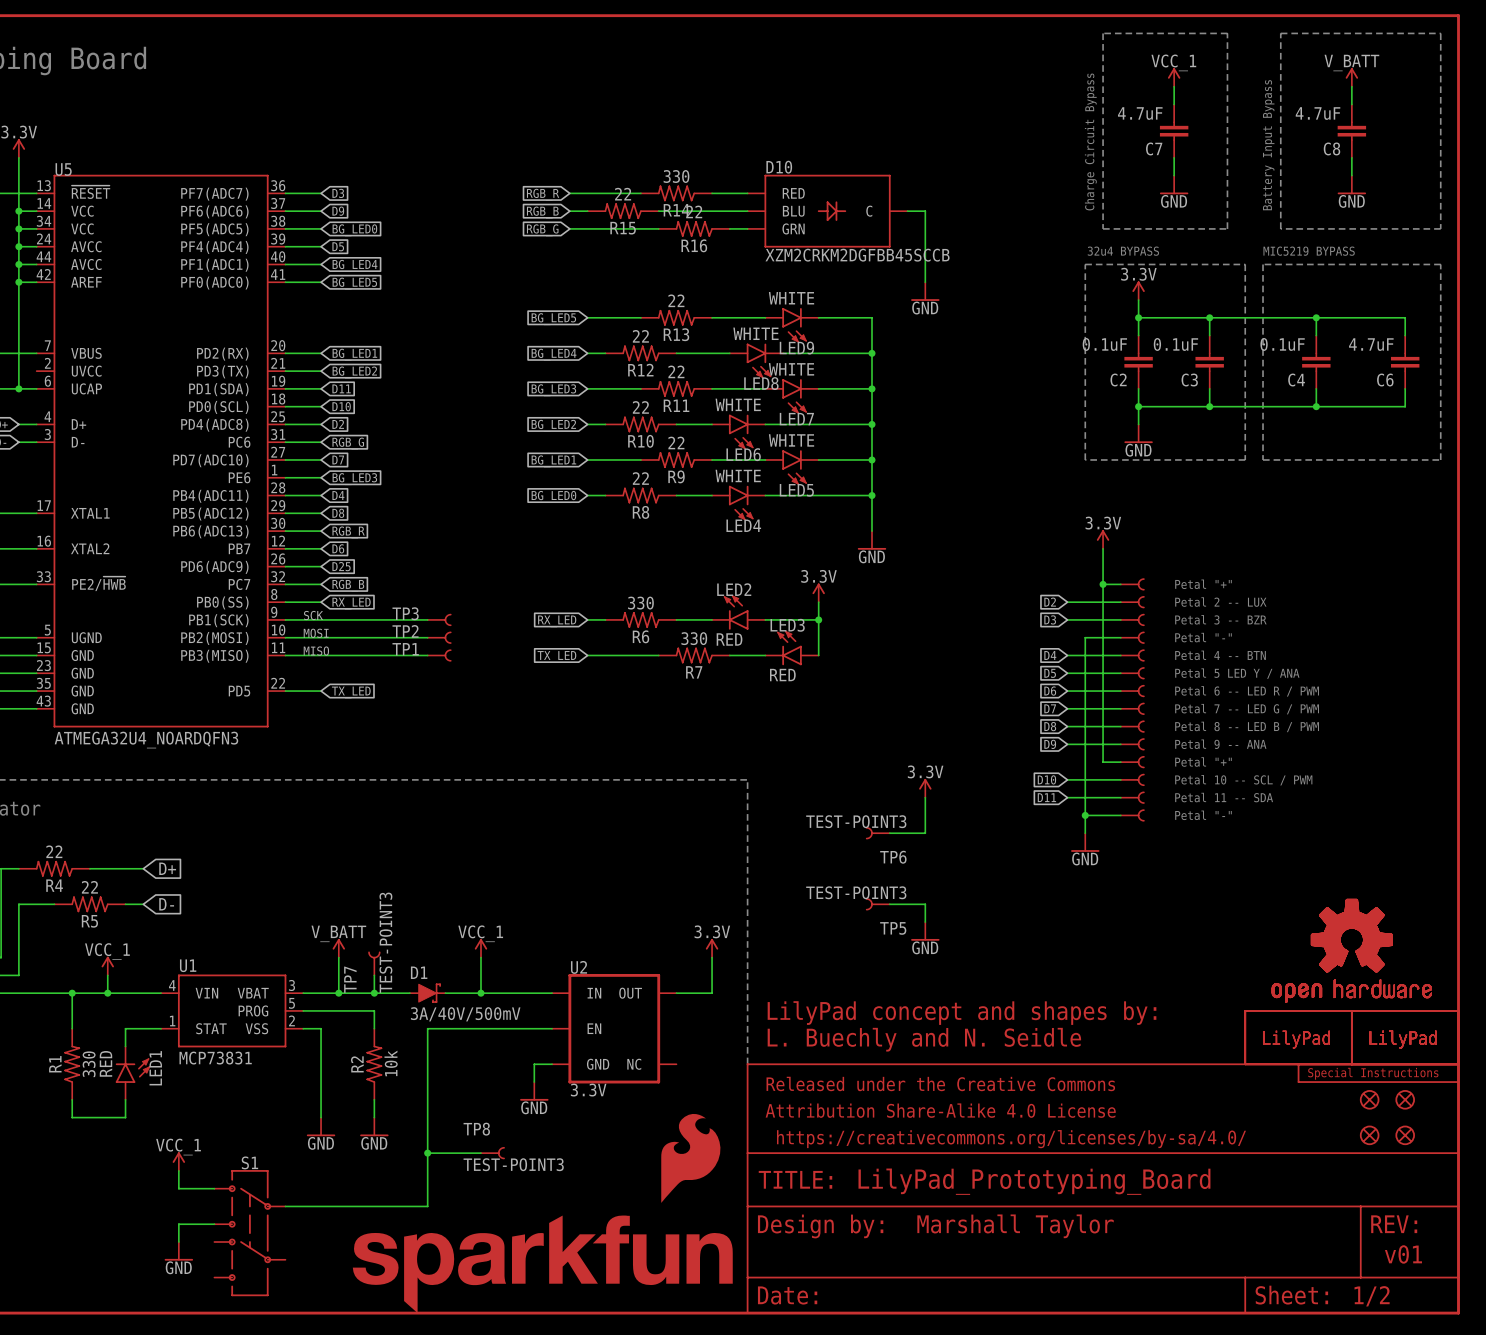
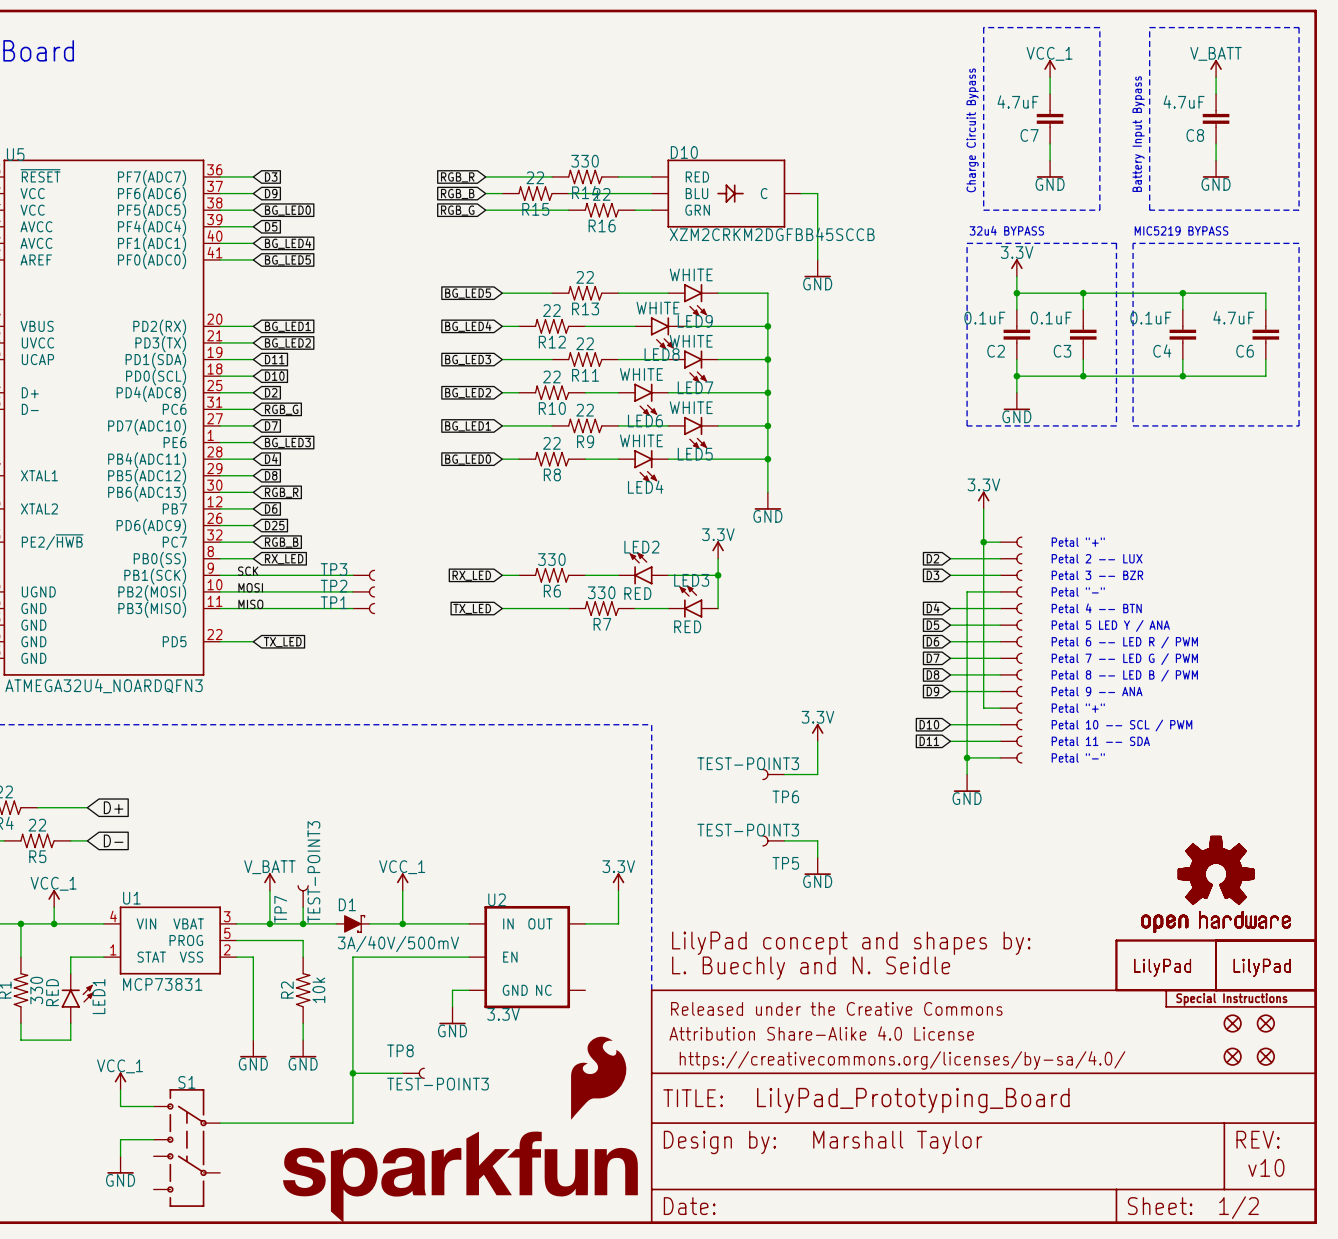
text: v01 (1403, 1254) -> v10 (1266, 1167)

